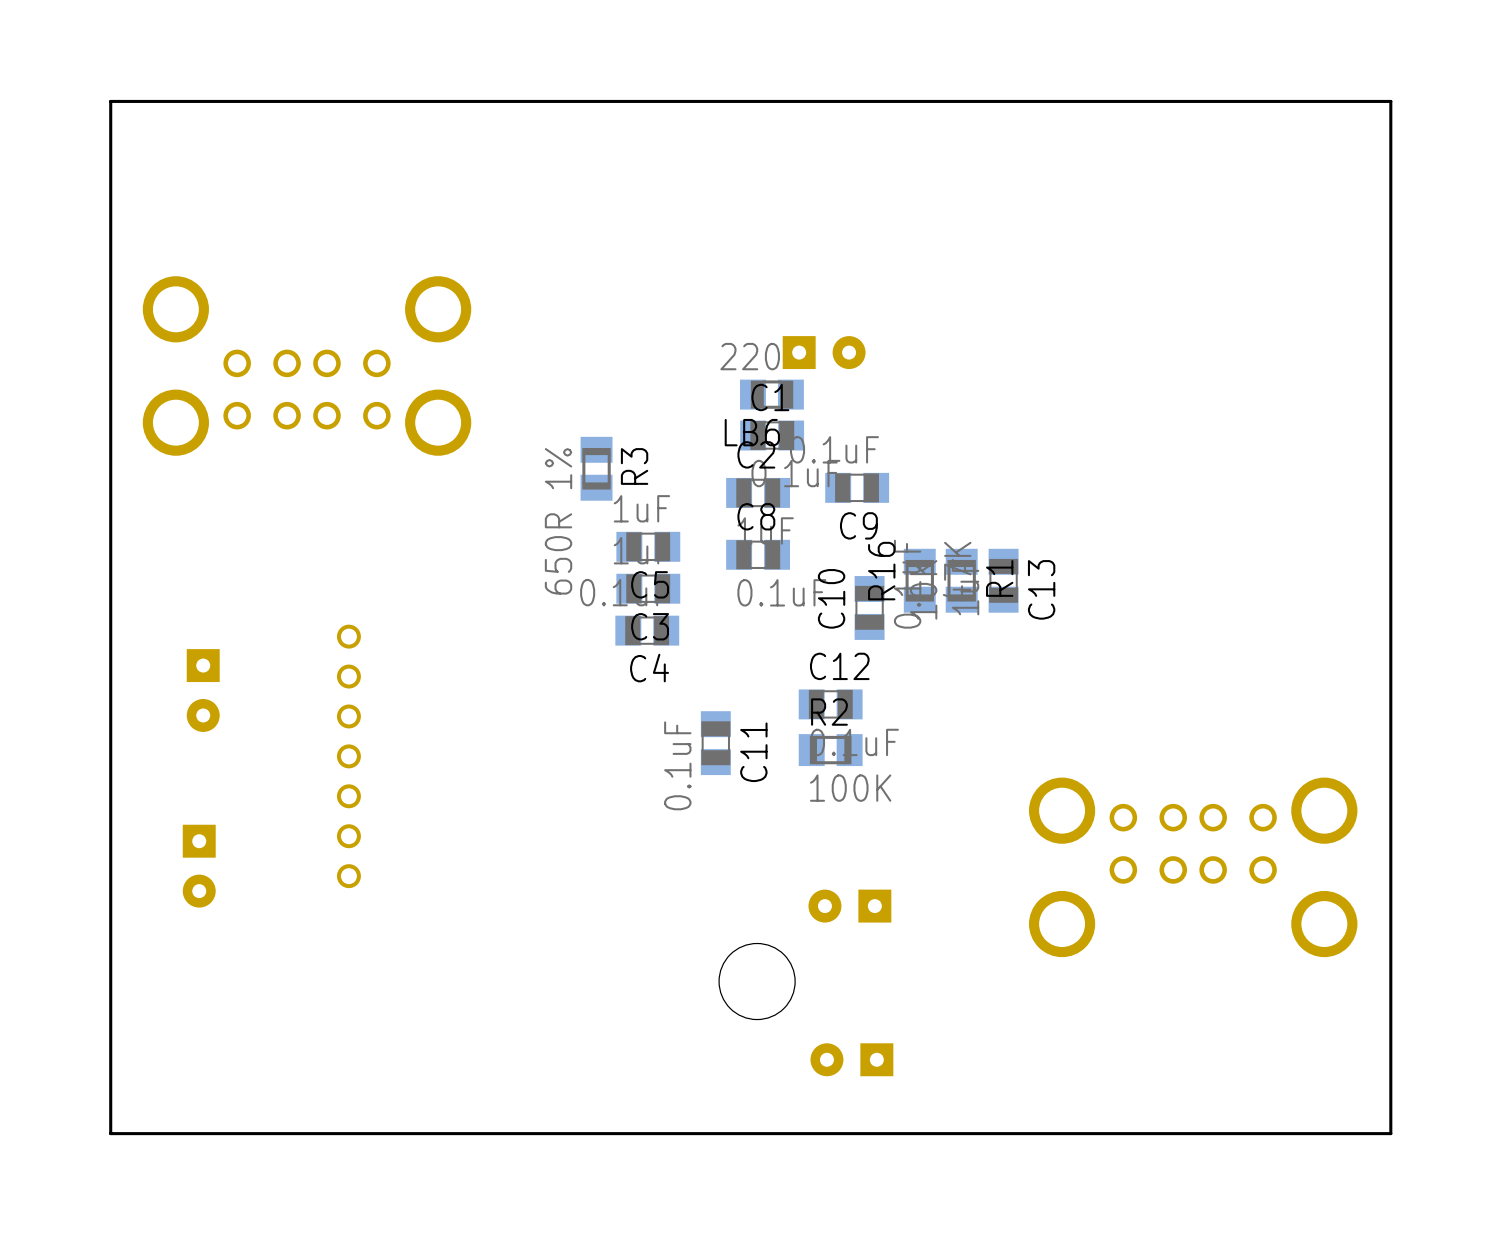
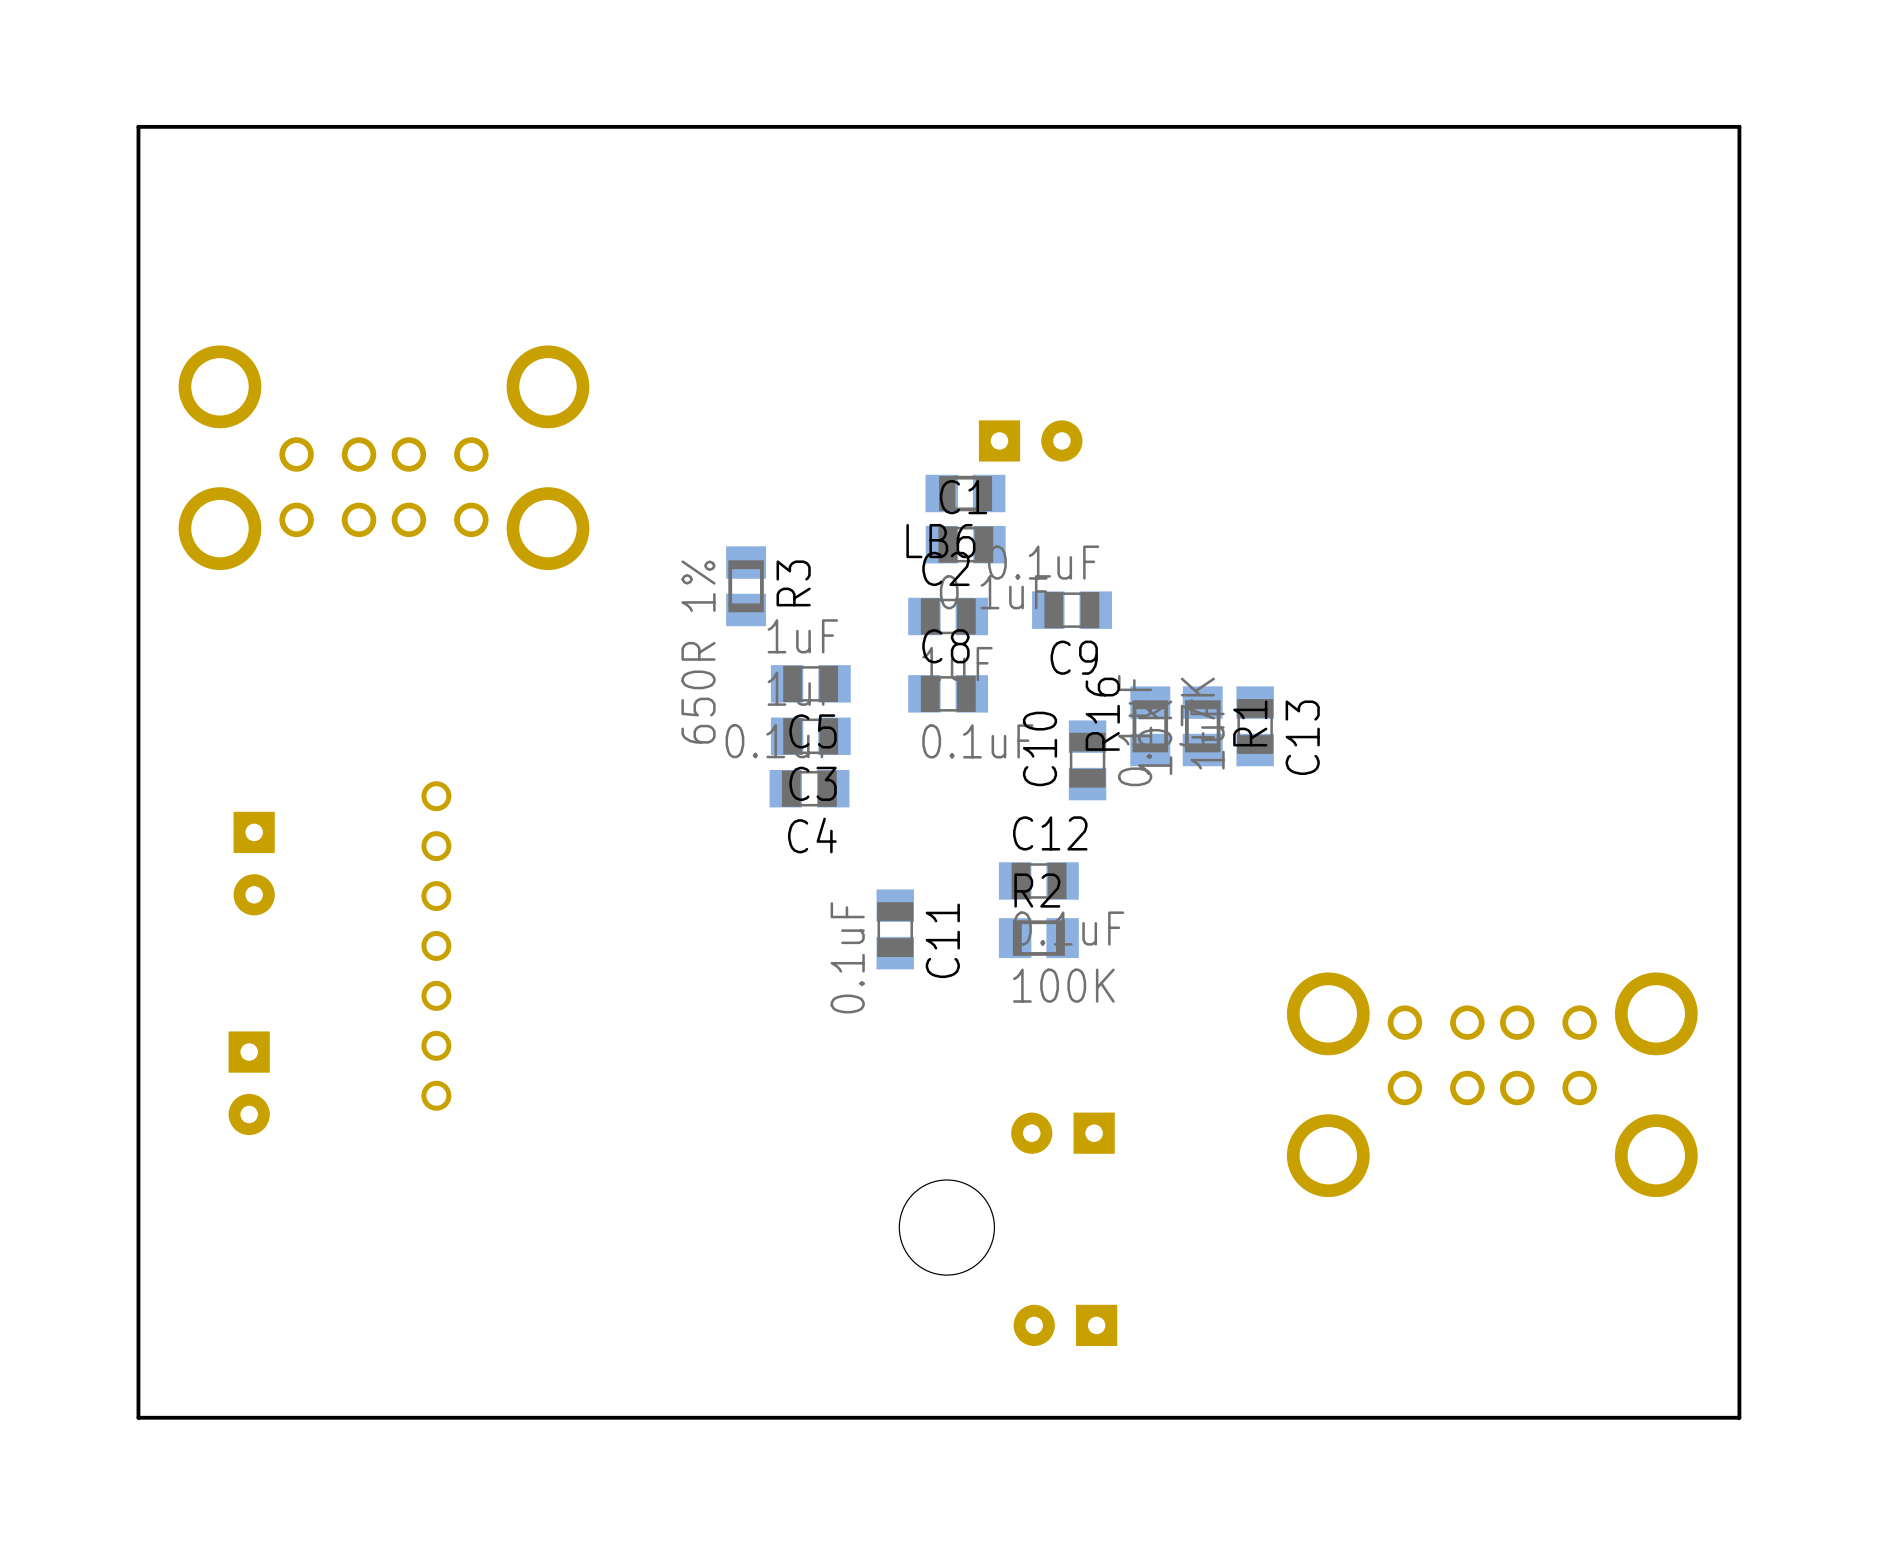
LB6 value: 220 (750, 356) -> none

